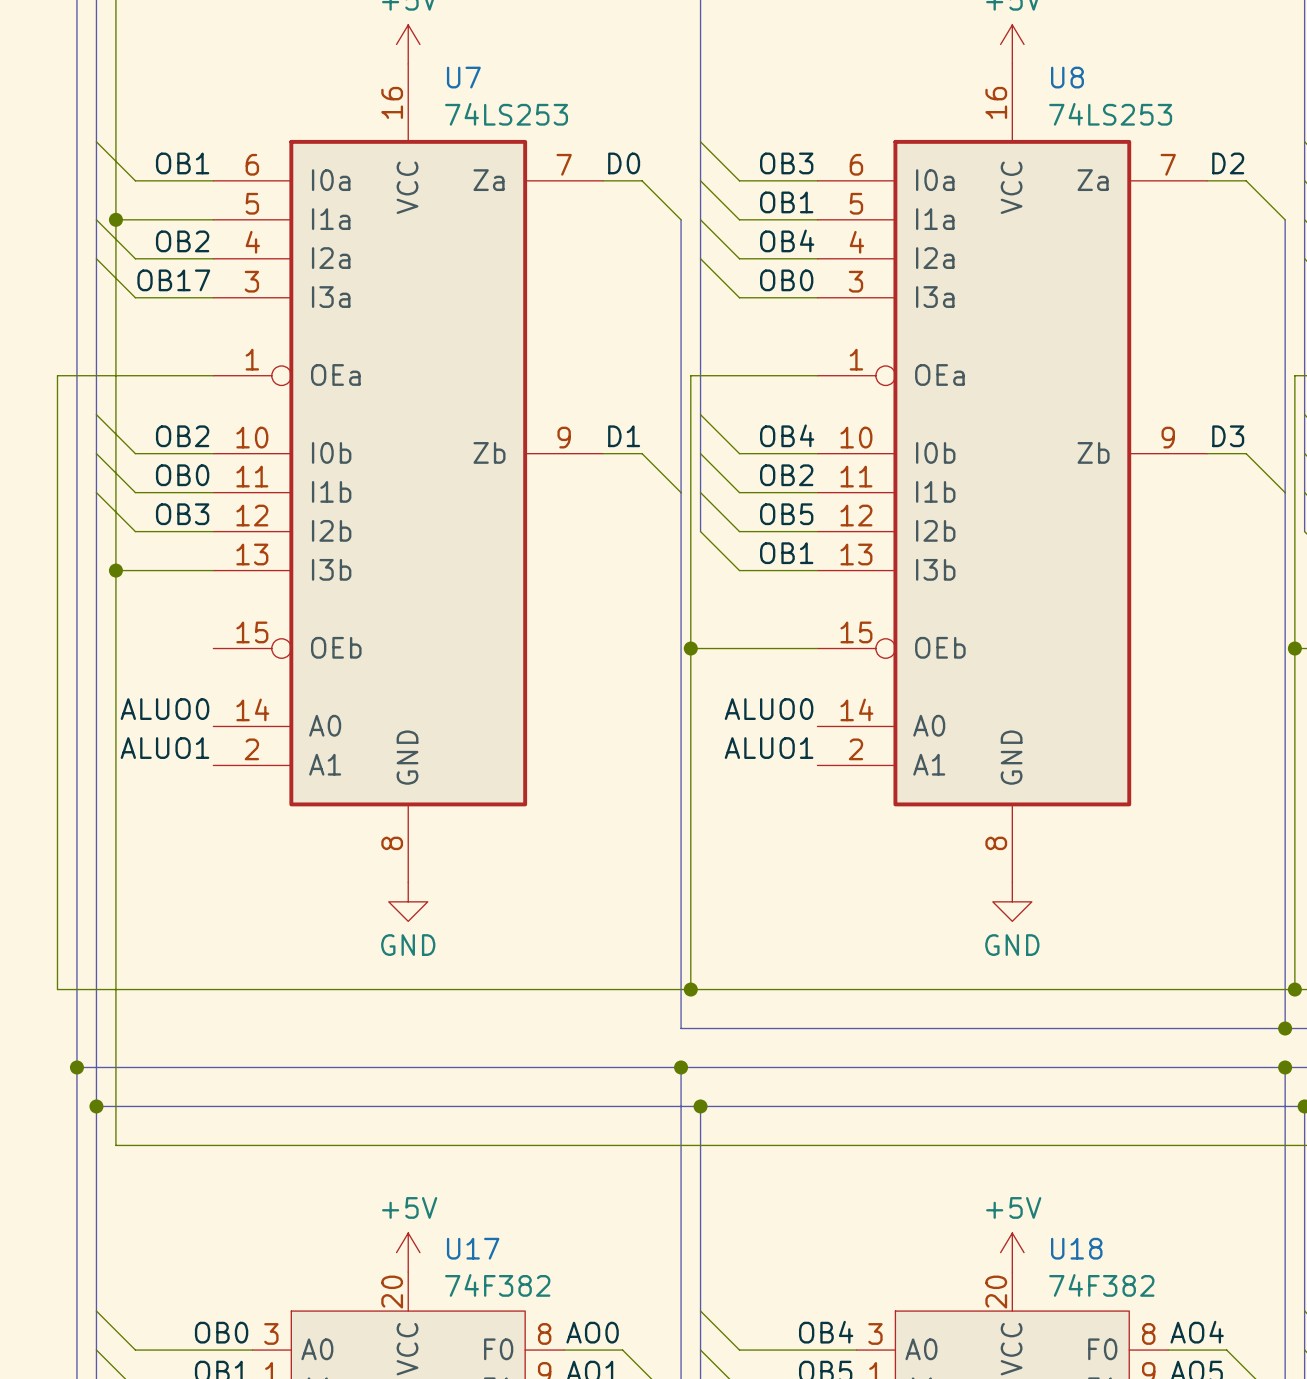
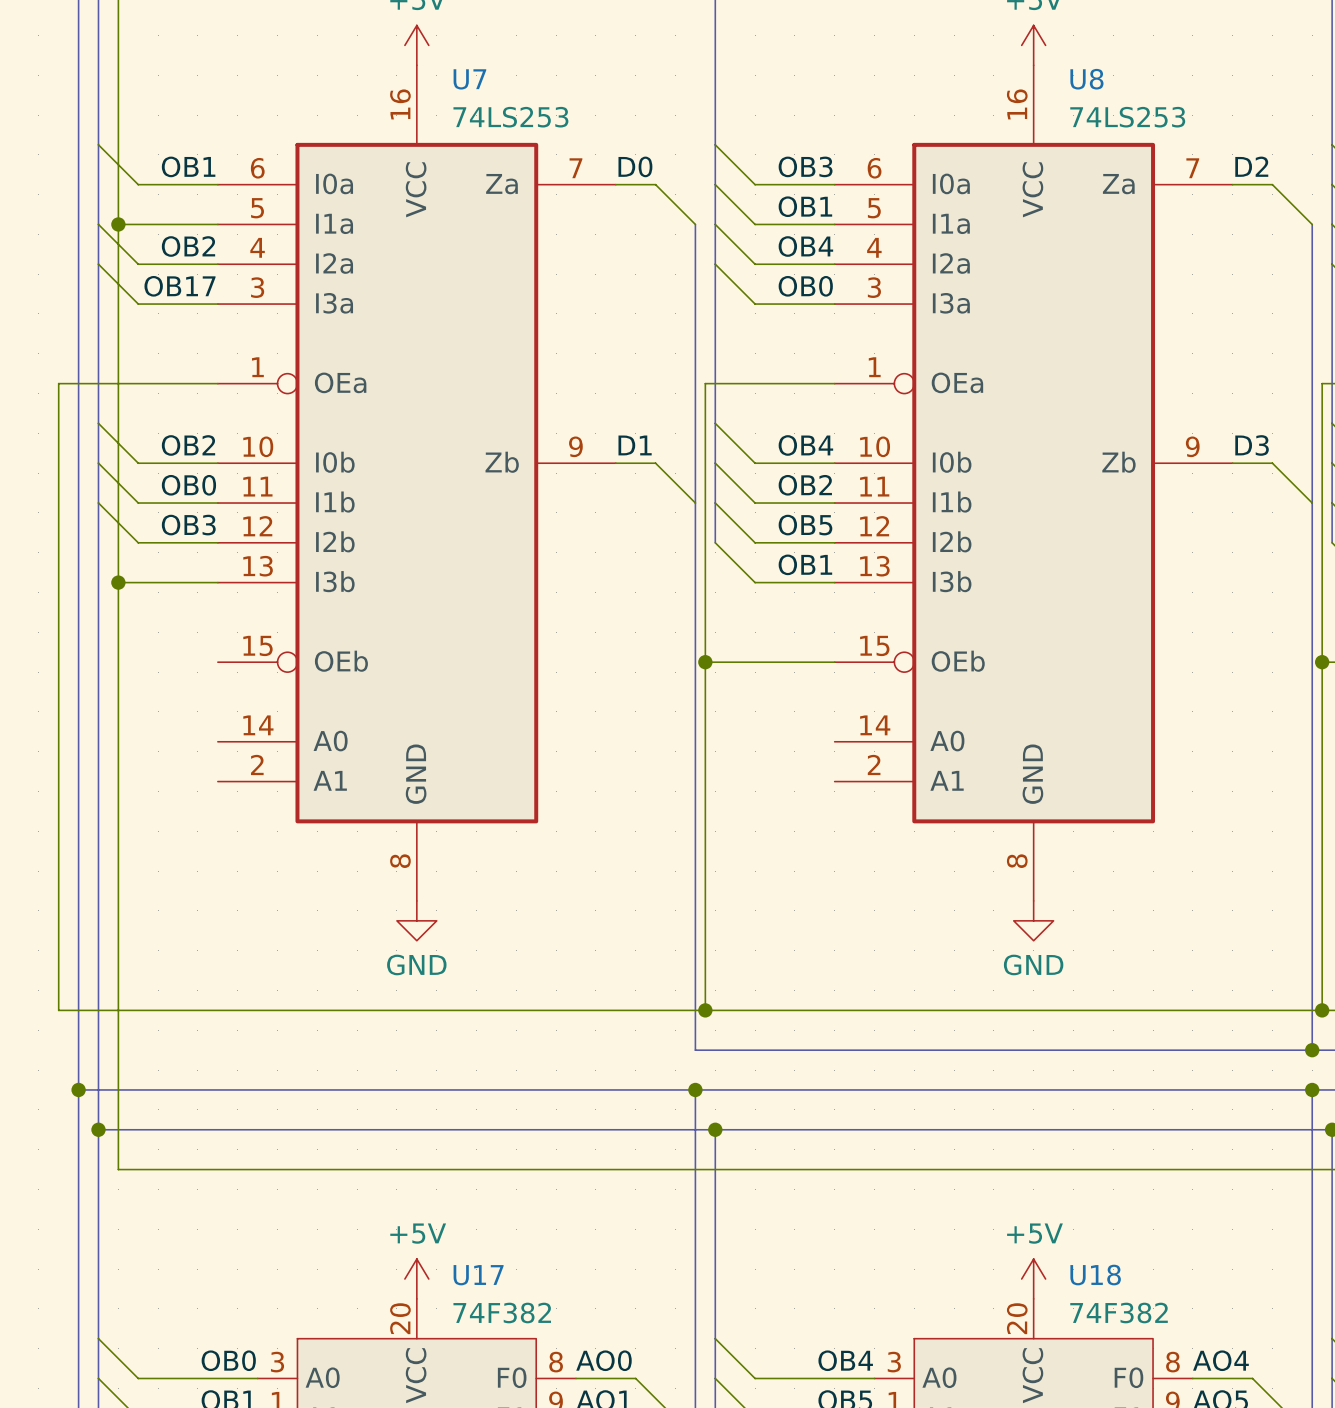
label: ALUO0 (164, 709) -> none
label: ALUO0 (769, 709) -> none
label: ALUO1 (164, 748) -> none
label: ALUO1 (769, 748) -> none

